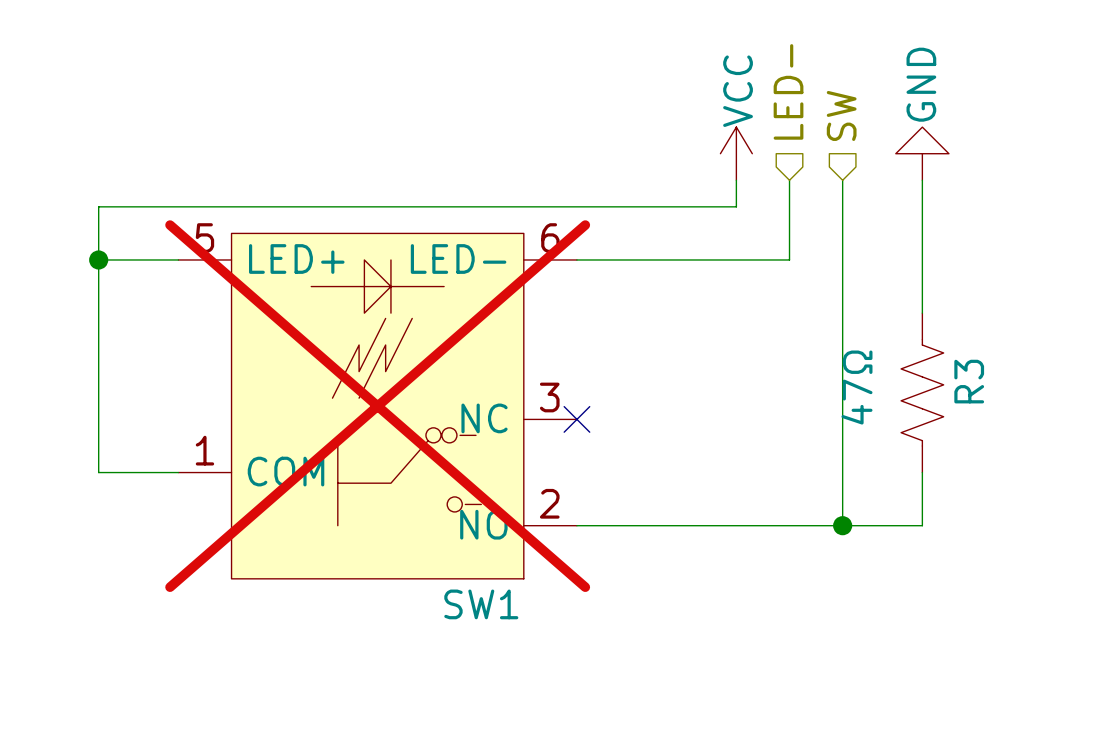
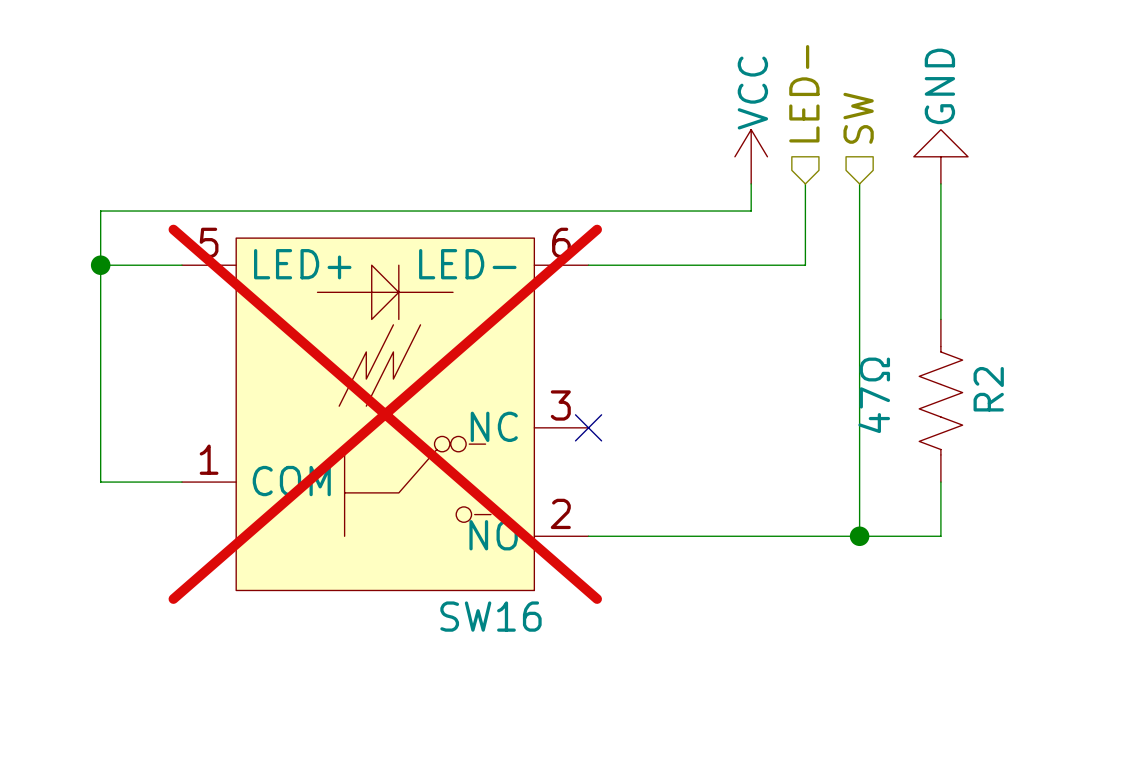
R3 name: R3 (969, 381) -> R2 (988, 389)
SW1 name: SW1 (481, 604) -> SW16 (490, 616)

